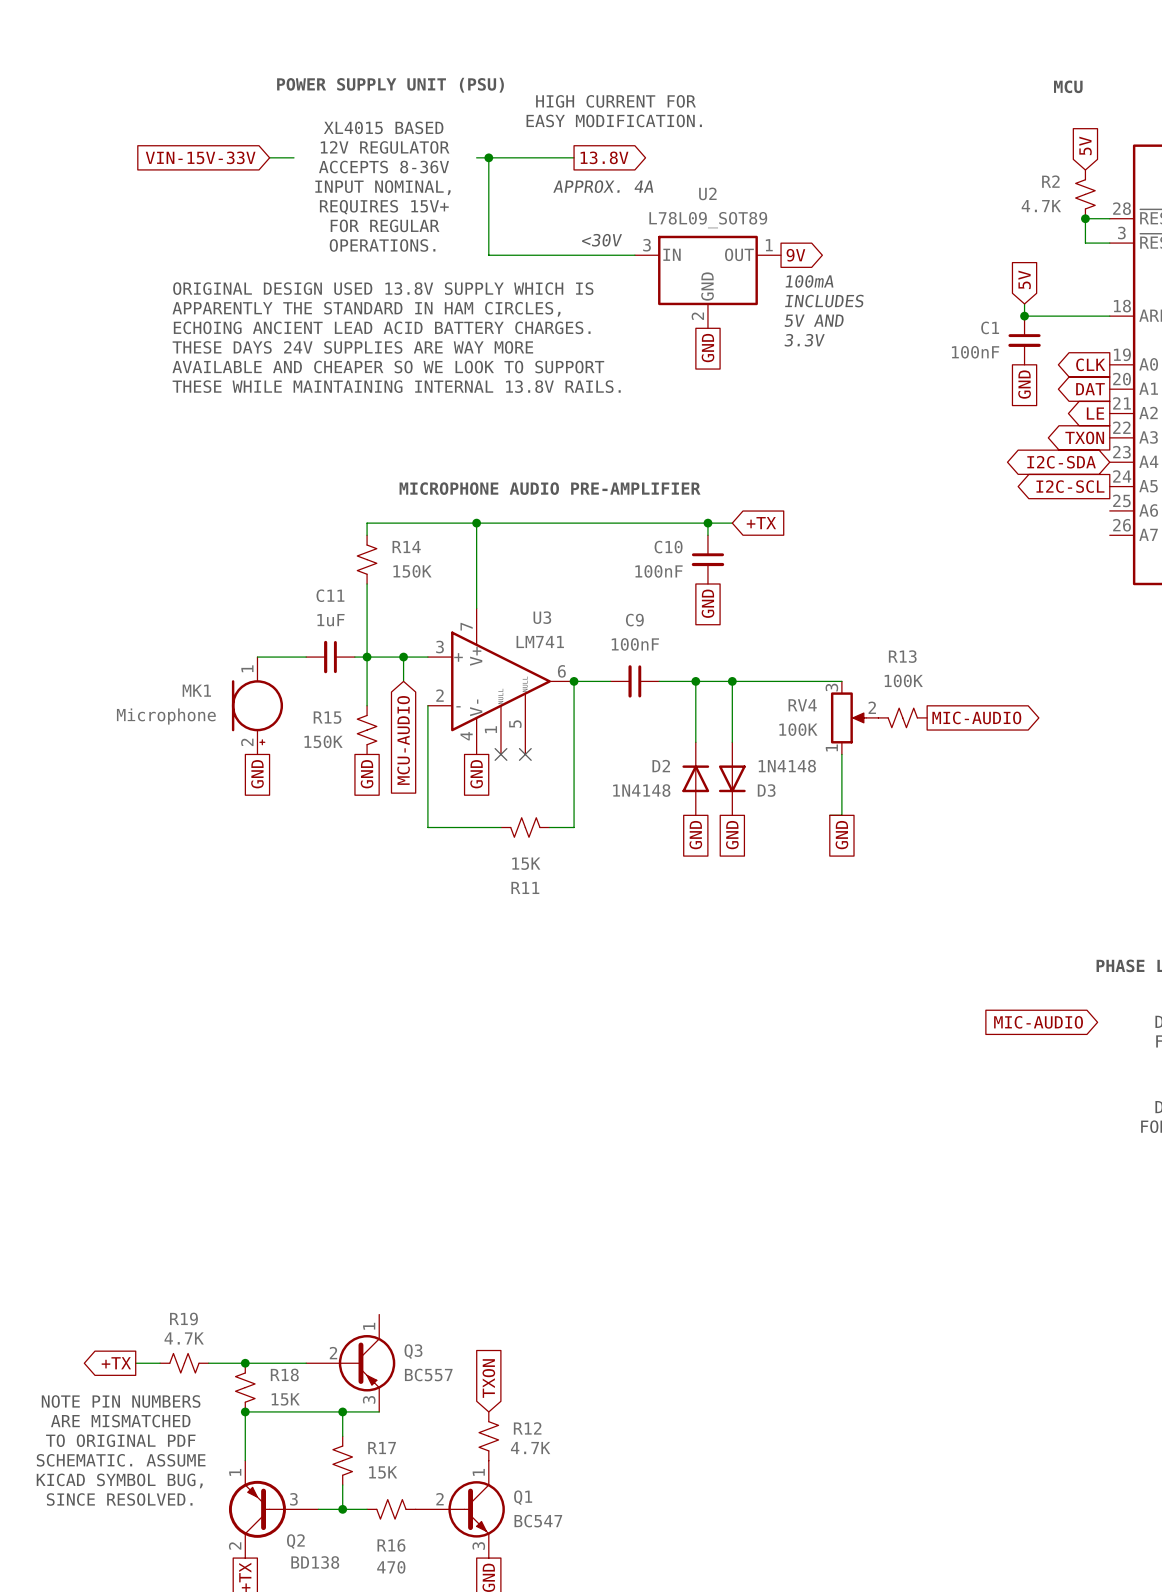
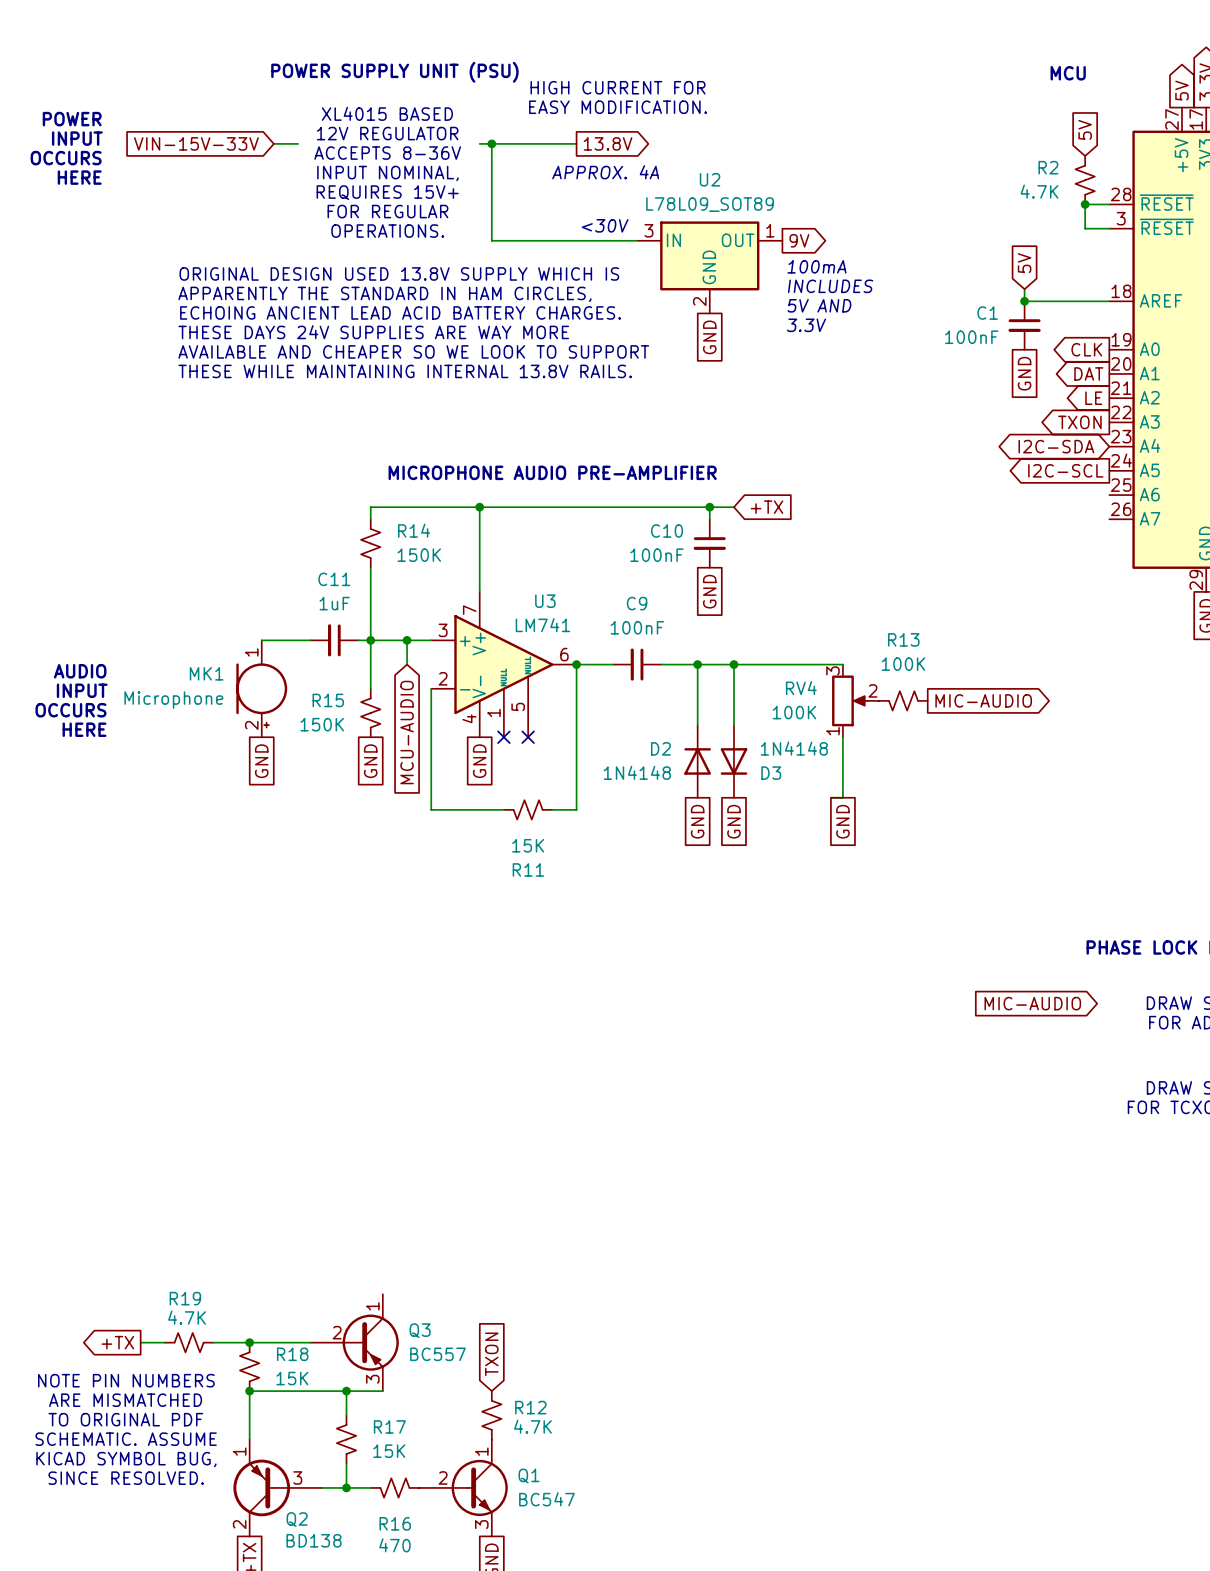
text: none -> POWER (72, 119)
text: none -> INPUT (77, 138)
text: none -> OCCURS (66, 158)
text: none -> HERE (79, 177)
text: none -> AUDIO (80, 671)
text: none -> INPUT (82, 690)
text: none -> OCCURS (70, 710)
text: none -> HERE (84, 729)

